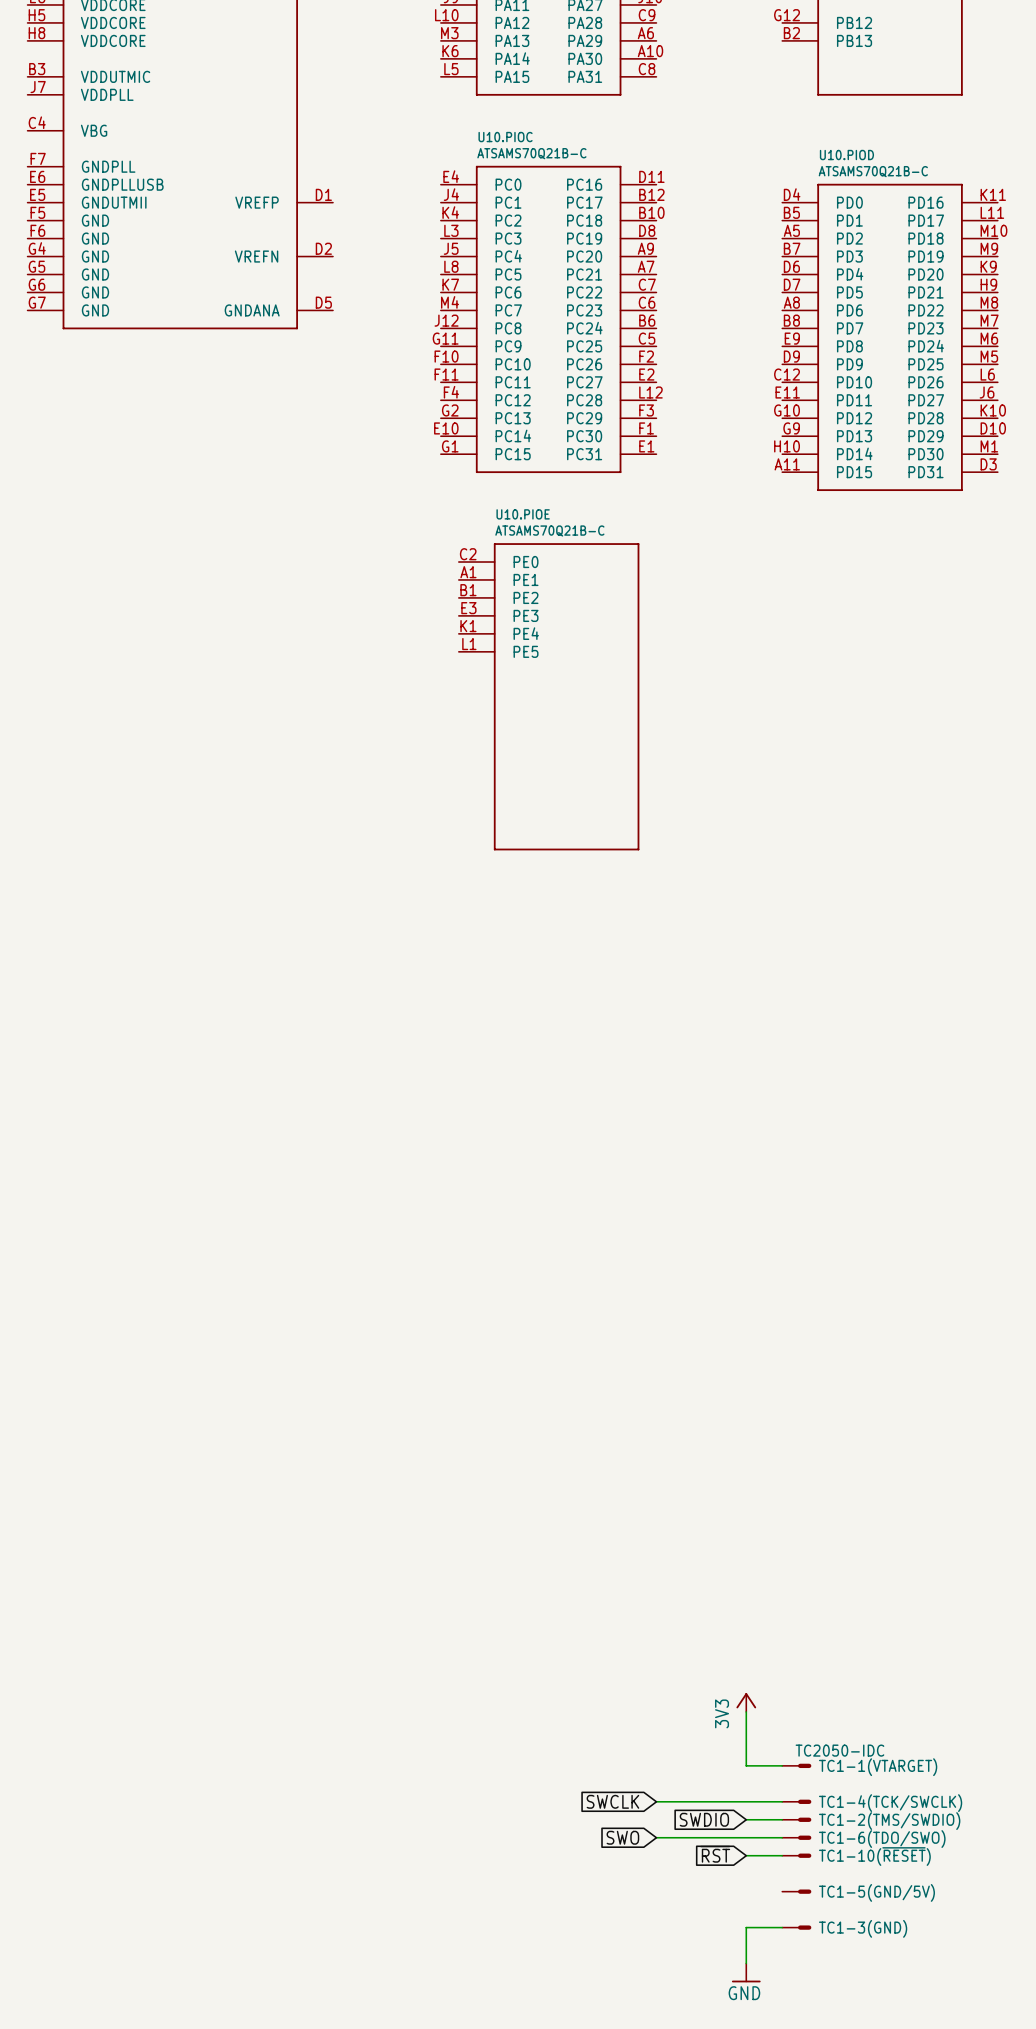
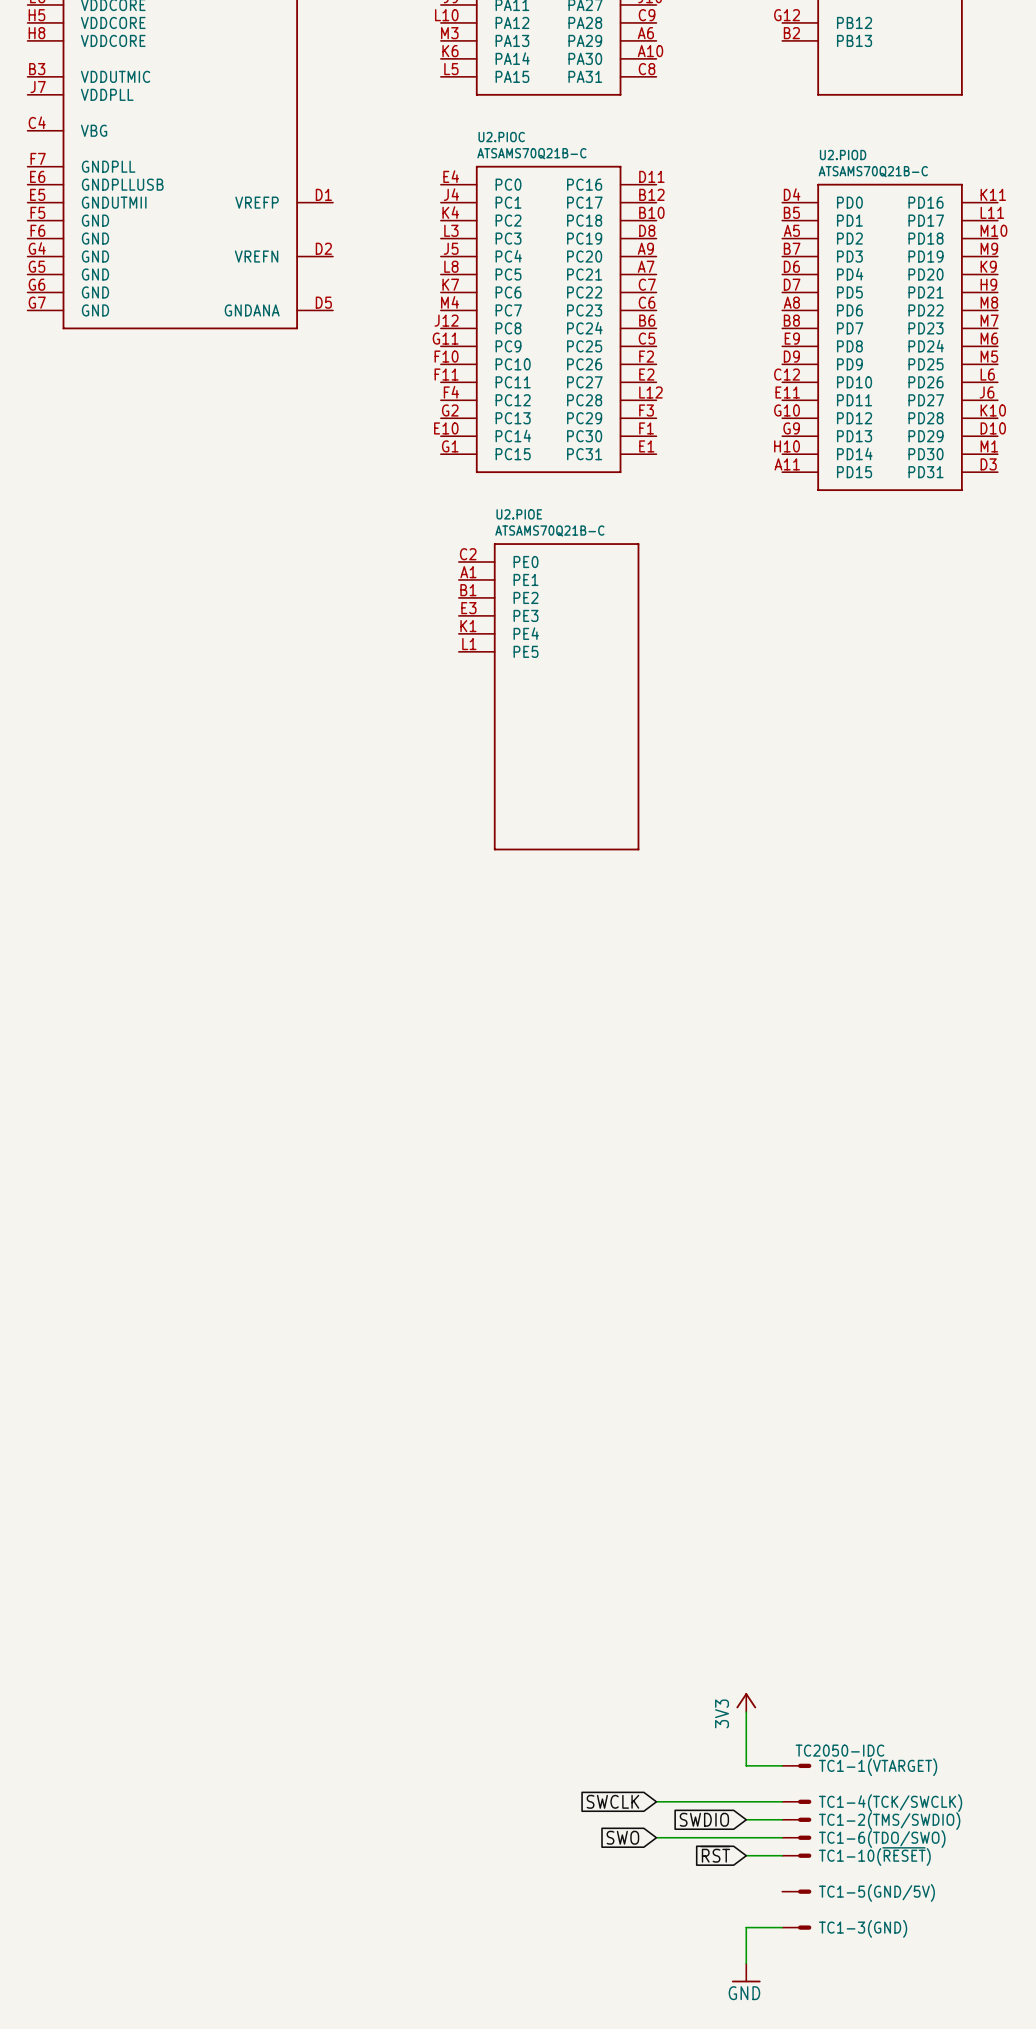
U10.PIOC name: U10.PIOC (505, 137) -> U2.PIOC (501, 137)
U10.PIOD name: U10.PIOD (846, 155) -> U2.PIOD (843, 155)
U10.PIOE name: U10.PIOE (523, 514) -> U2.PIOE (519, 514)

